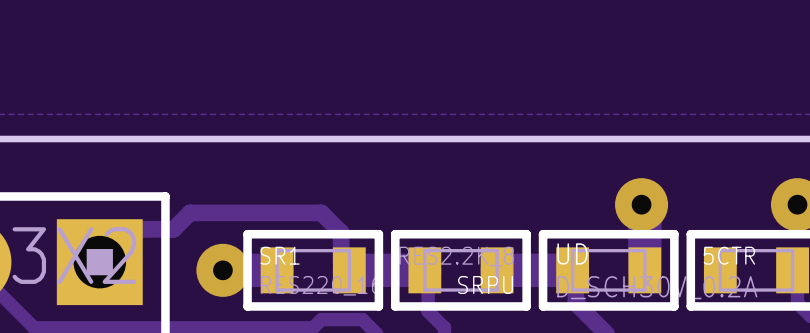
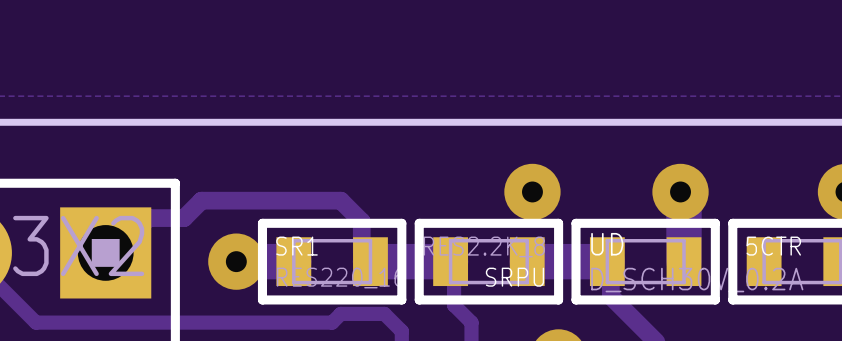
via: none -> (532, 191)

